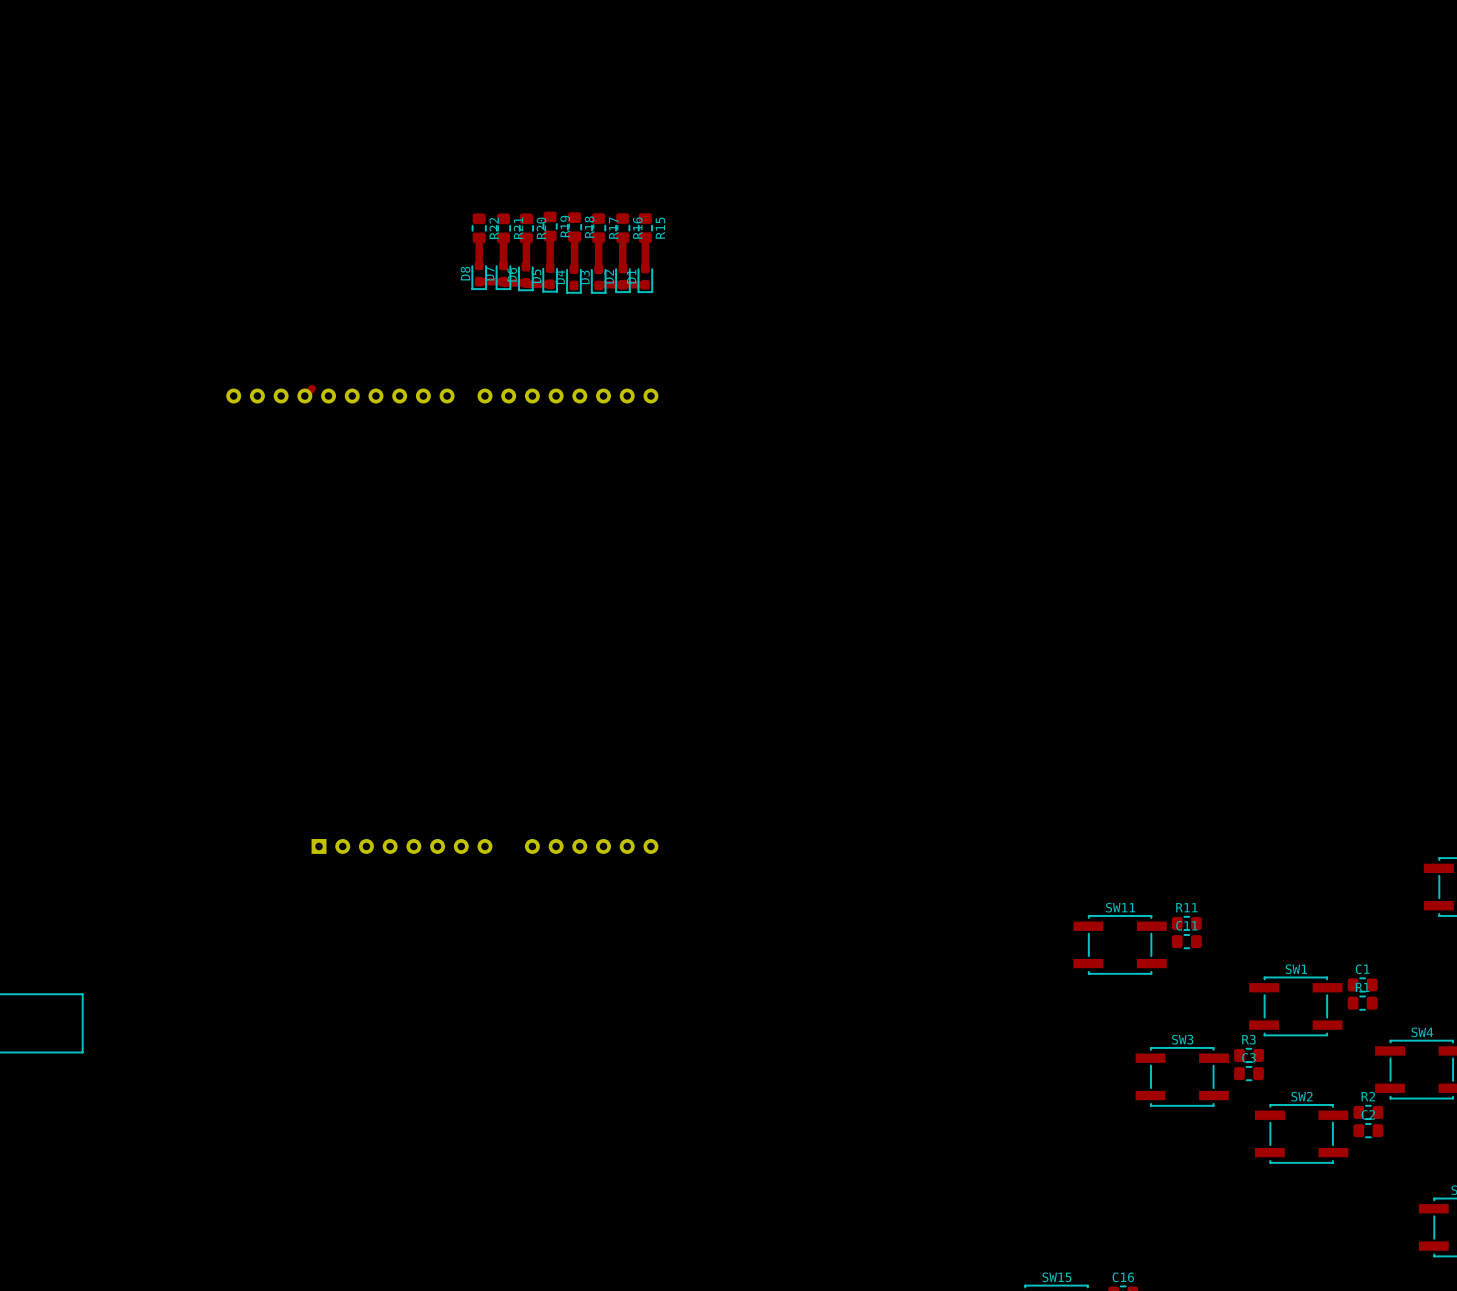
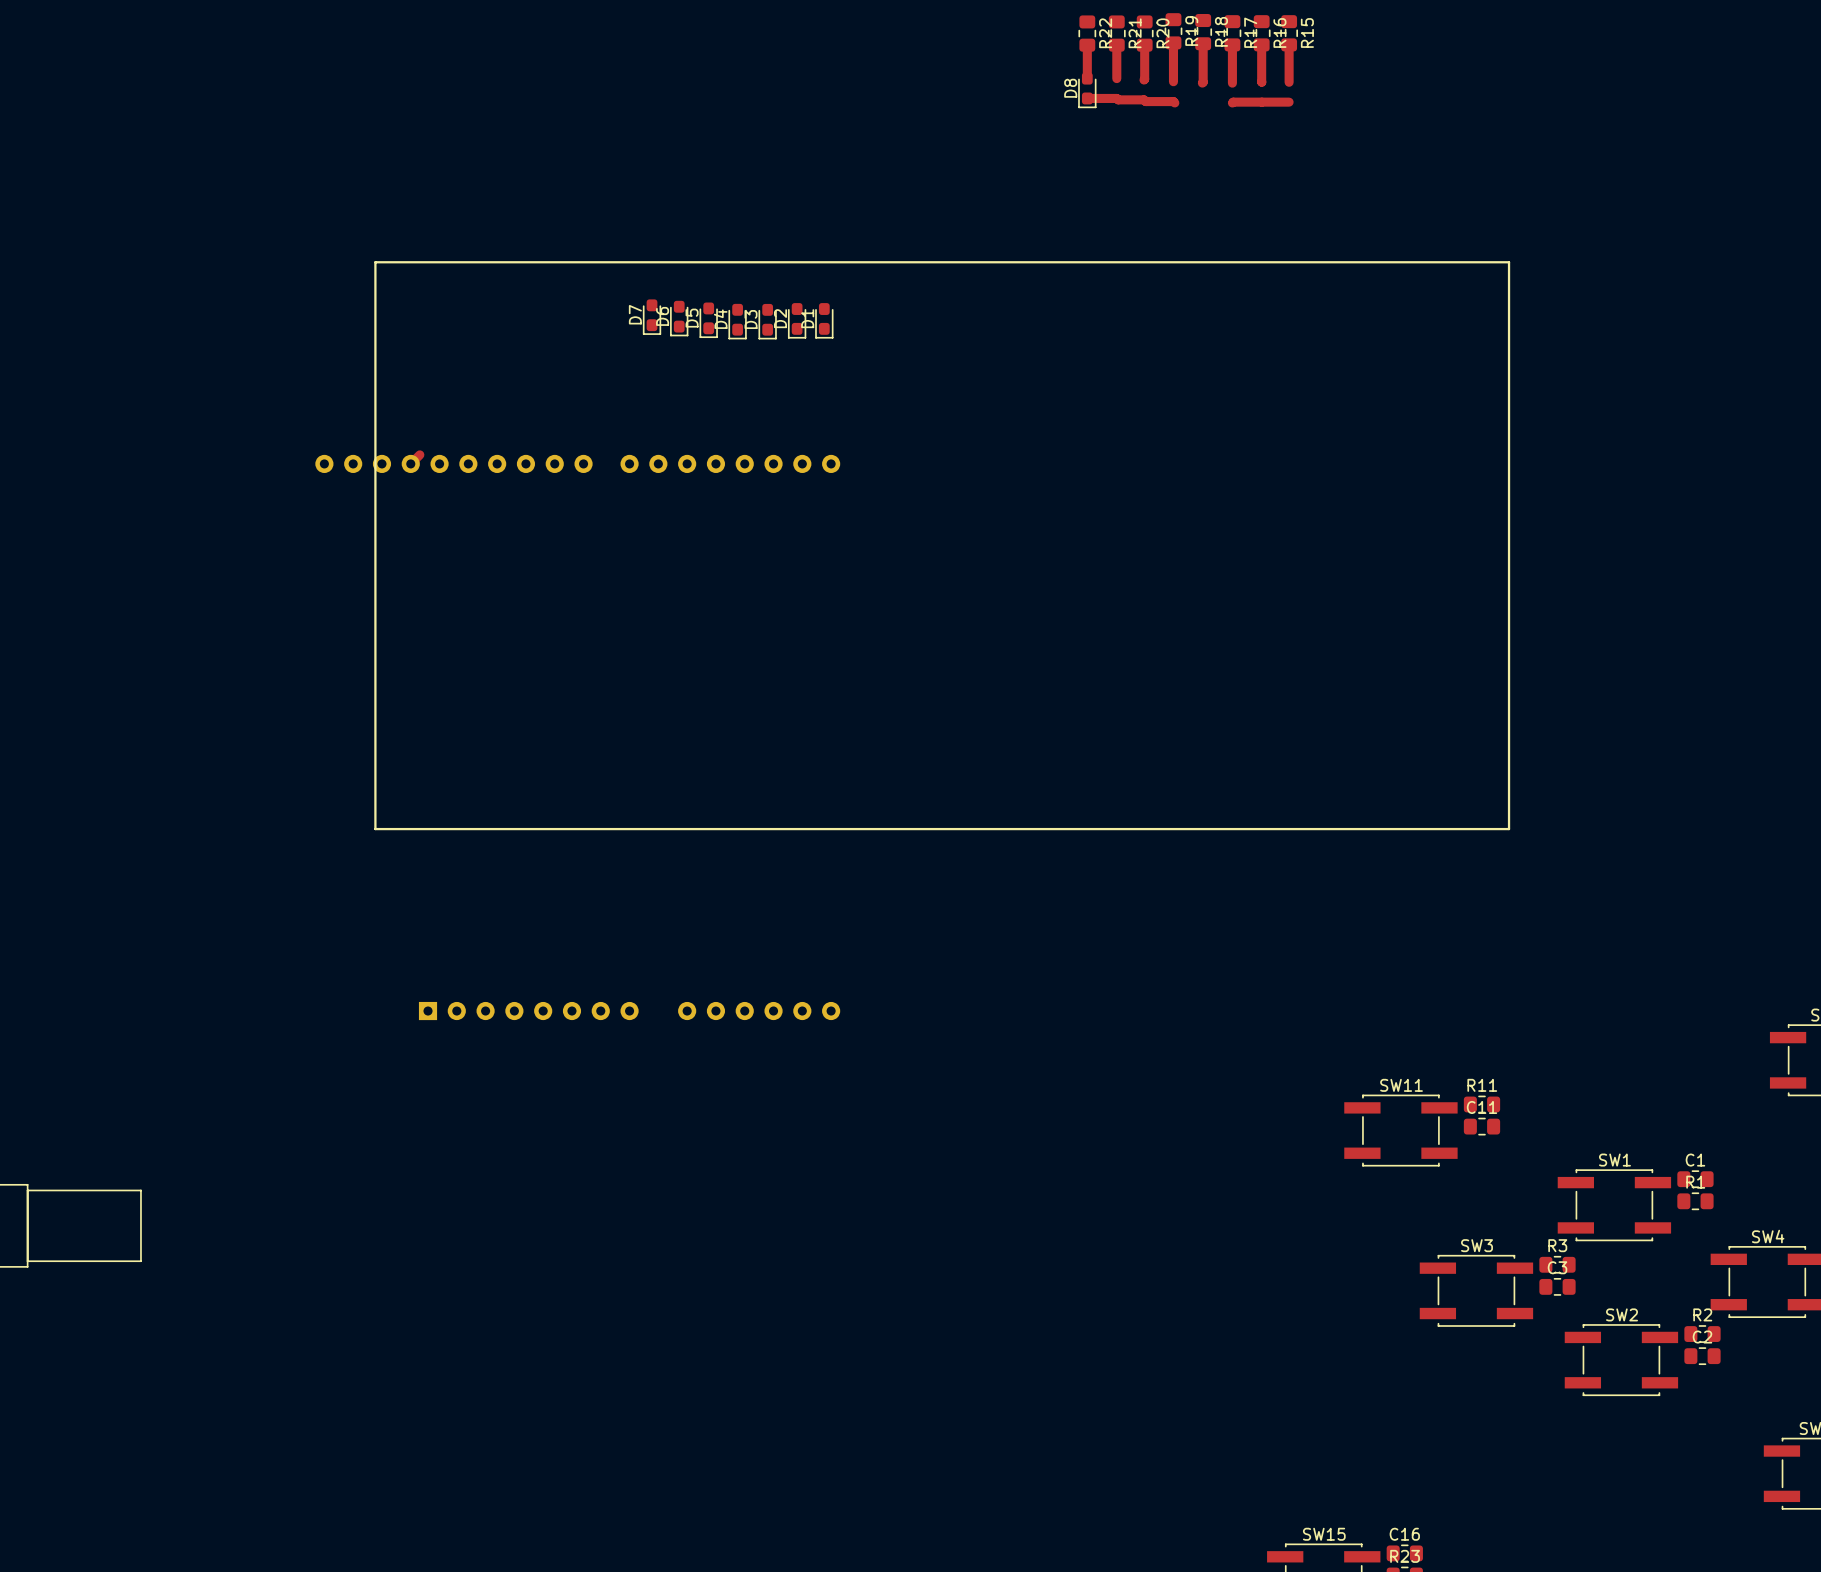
top track: none -> (1173, 42) (1173, 81)
top track: none -> (1203, 43) (1202, 83)
top track: none -> (1232, 44) (1232, 83)
top track: none -> (1261, 44) (1261, 82)
top track: none -> (1289, 44) (1289, 82)
top track: none -> (1087, 45) (1087, 78)
top track: none -> (1116, 45) (1116, 78)
top track: none -> (1144, 45) (1144, 80)
top track: none -> (1087, 98) (1116, 98) (1174, 102)
top track: none -> (1289, 102) (1232, 102)
R19 position: (550, 226) -> (1173, 31)
R18 position: (574, 227) -> (1203, 32)
R22 position: (479, 228) -> (1087, 33)
R21 position: (503, 228) -> (1116, 33)
R20 position: (526, 228) -> (1144, 33)
R17 position: (598, 228) -> (1232, 33)
R16 position: (622, 228) -> (1261, 33)
R15 position: (645, 228) -> (1289, 33)
line: none -> (375, 262) (375, 829) (1509, 829) (1509, 262) (375, 262)
top track: (550, 236) (550, 268) -> none
top track: (574, 236) (573, 269) -> none
top track: (479, 237) (479, 265) -> none
top track: (503, 237) (503, 265) -> none
top track: (526, 237) (525, 266) -> none
top track: (598, 237) (598, 269) -> none
top track: (622, 237) (622, 268) -> none
top track: (645, 237) (645, 268) -> none
D8 position: (479, 275) -> (1087, 90)
top track: (479, 281) (551, 285) -> none
top track: (645, 284) (598, 285) -> none

